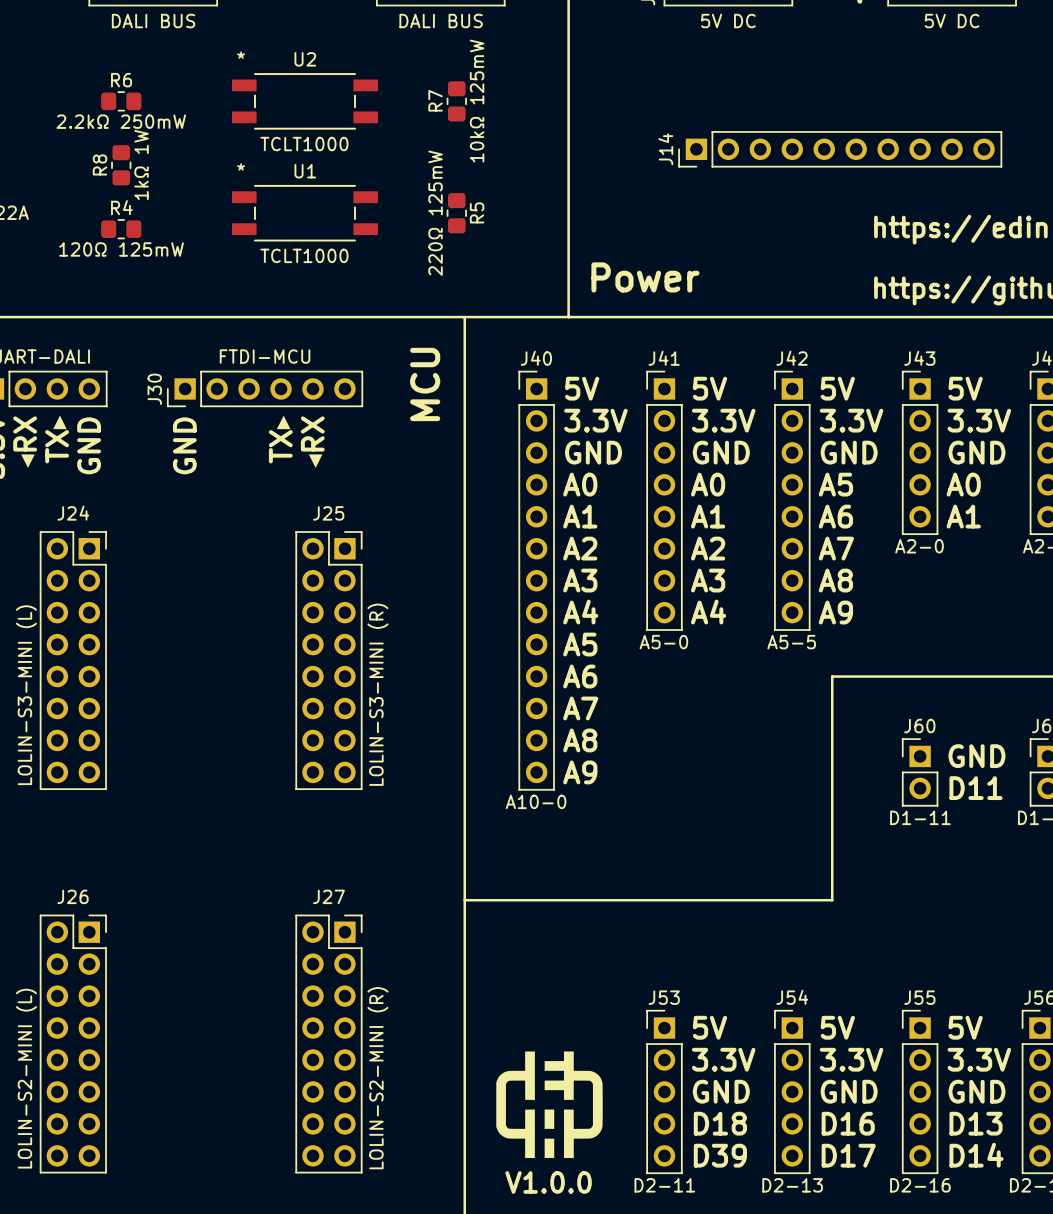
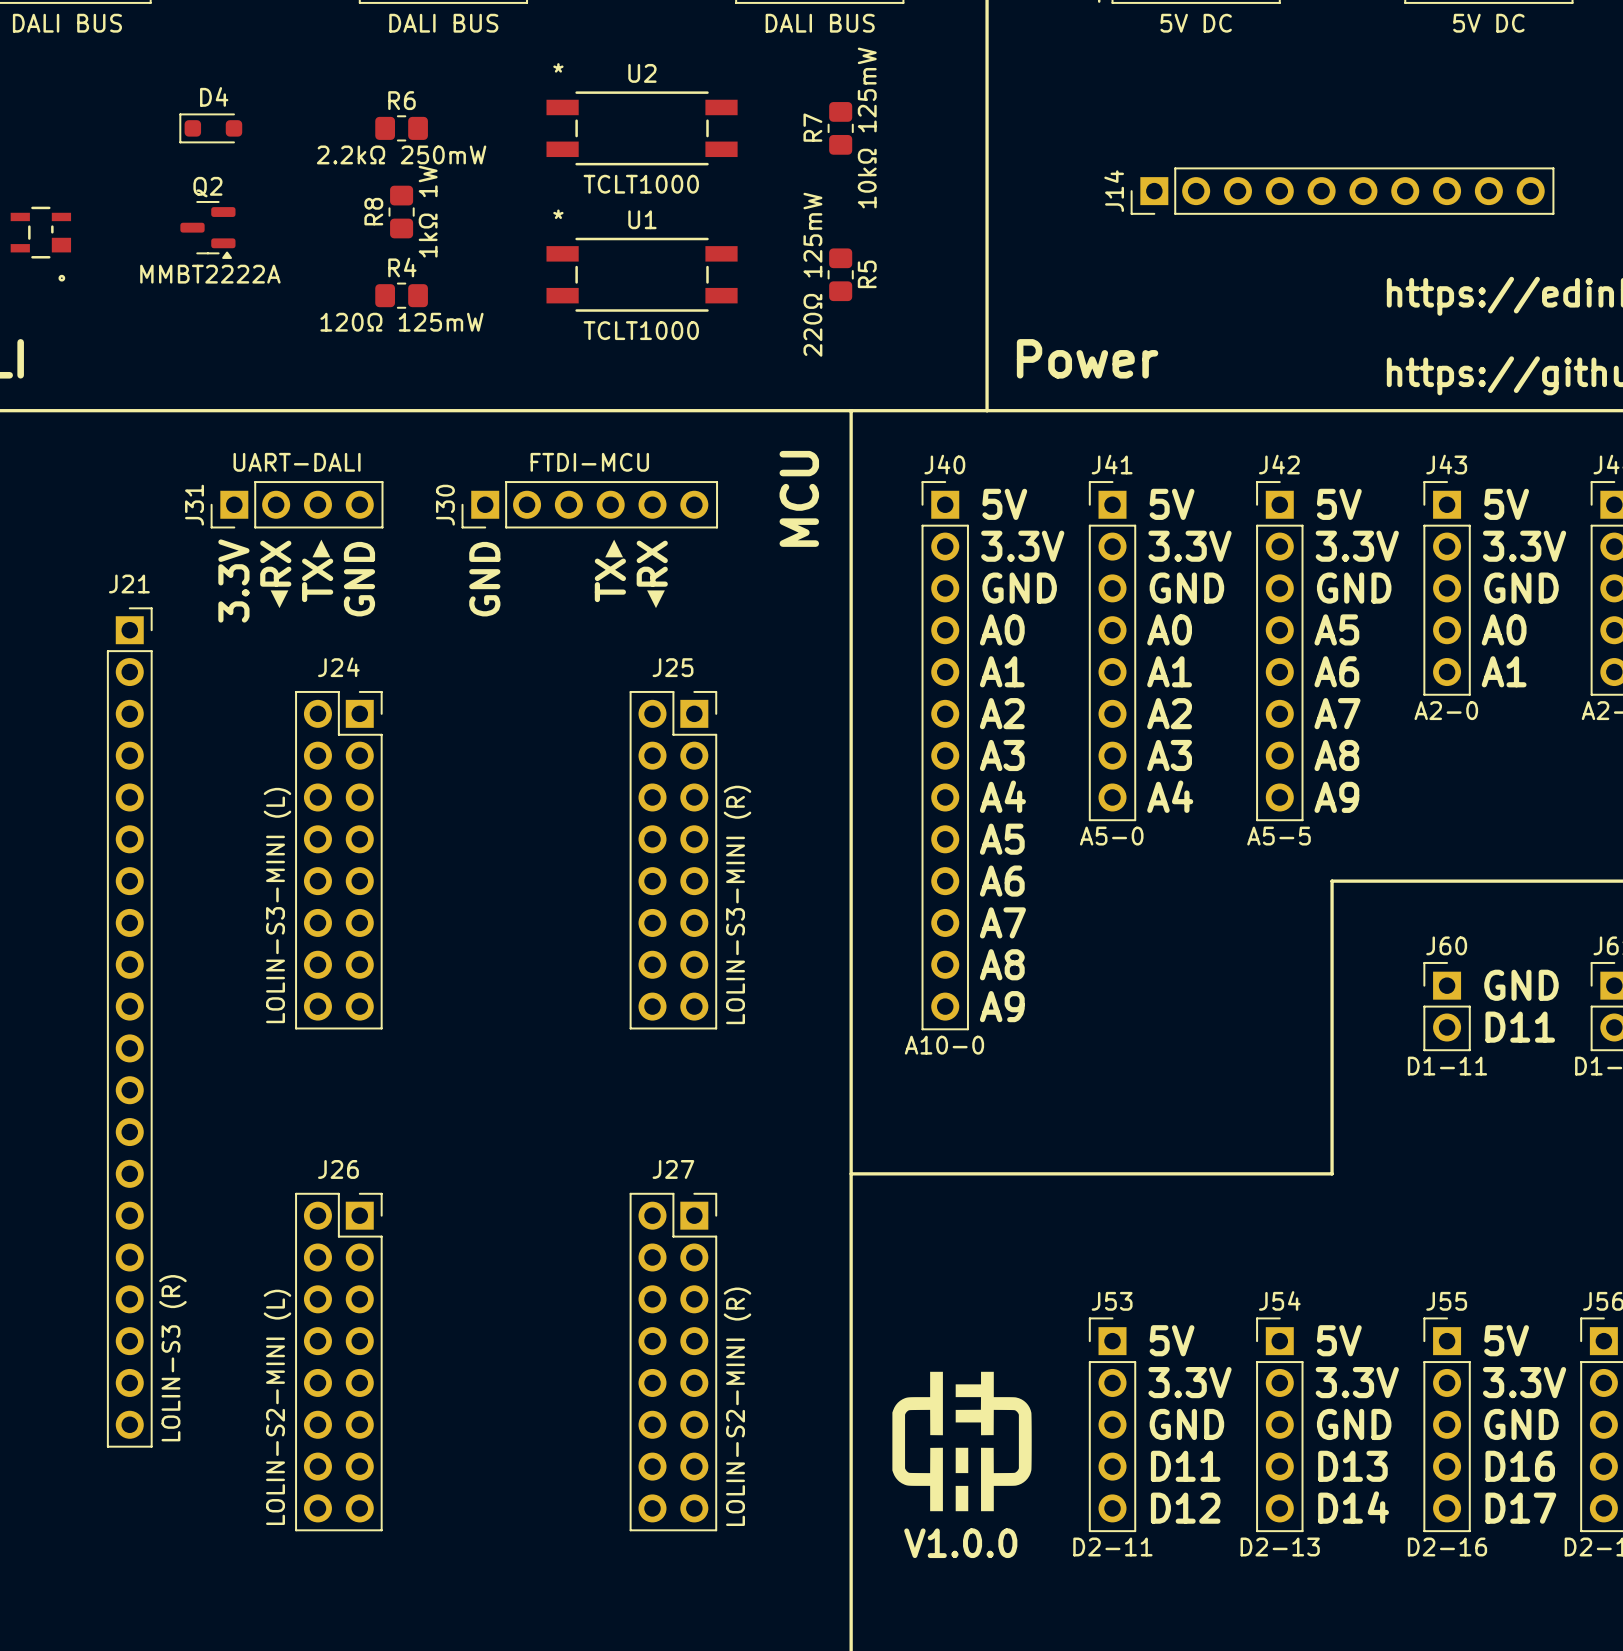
text: D18 (720, 1123) -> D11 (1185, 1466)
text: D16 (848, 1123) -> D13 (1352, 1466)
text: D13 (976, 1123) -> D16 (1520, 1466)
text: D39 (720, 1155) -> D12 (1185, 1508)
text: D17 (848, 1155) -> D14 (1353, 1507)
text: D14 (976, 1155) -> D17 (1520, 1508)

